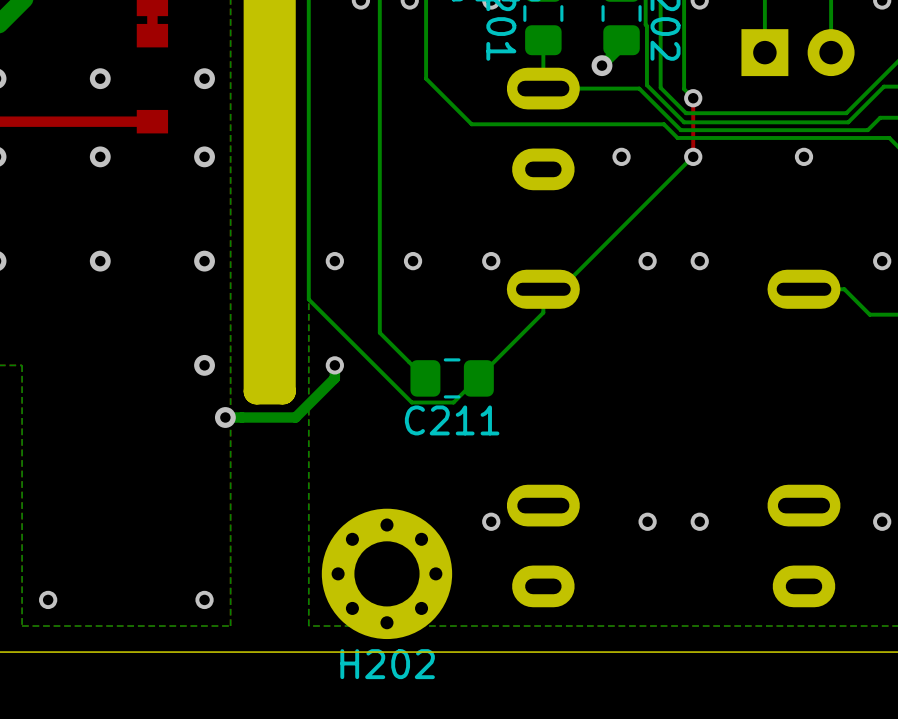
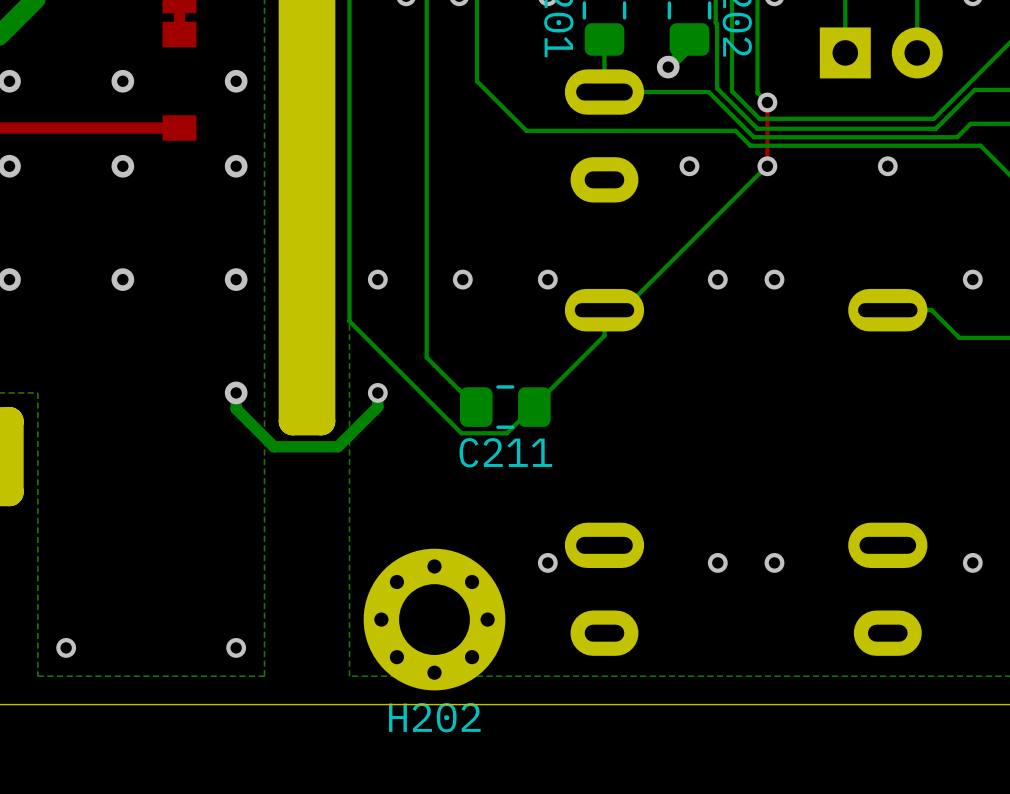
bottom track: (298, 414) (295, 417) (225, 417) -> (338, 446) (273, 446) (236, 408) (236, 392)
via: (225, 417) -> none

